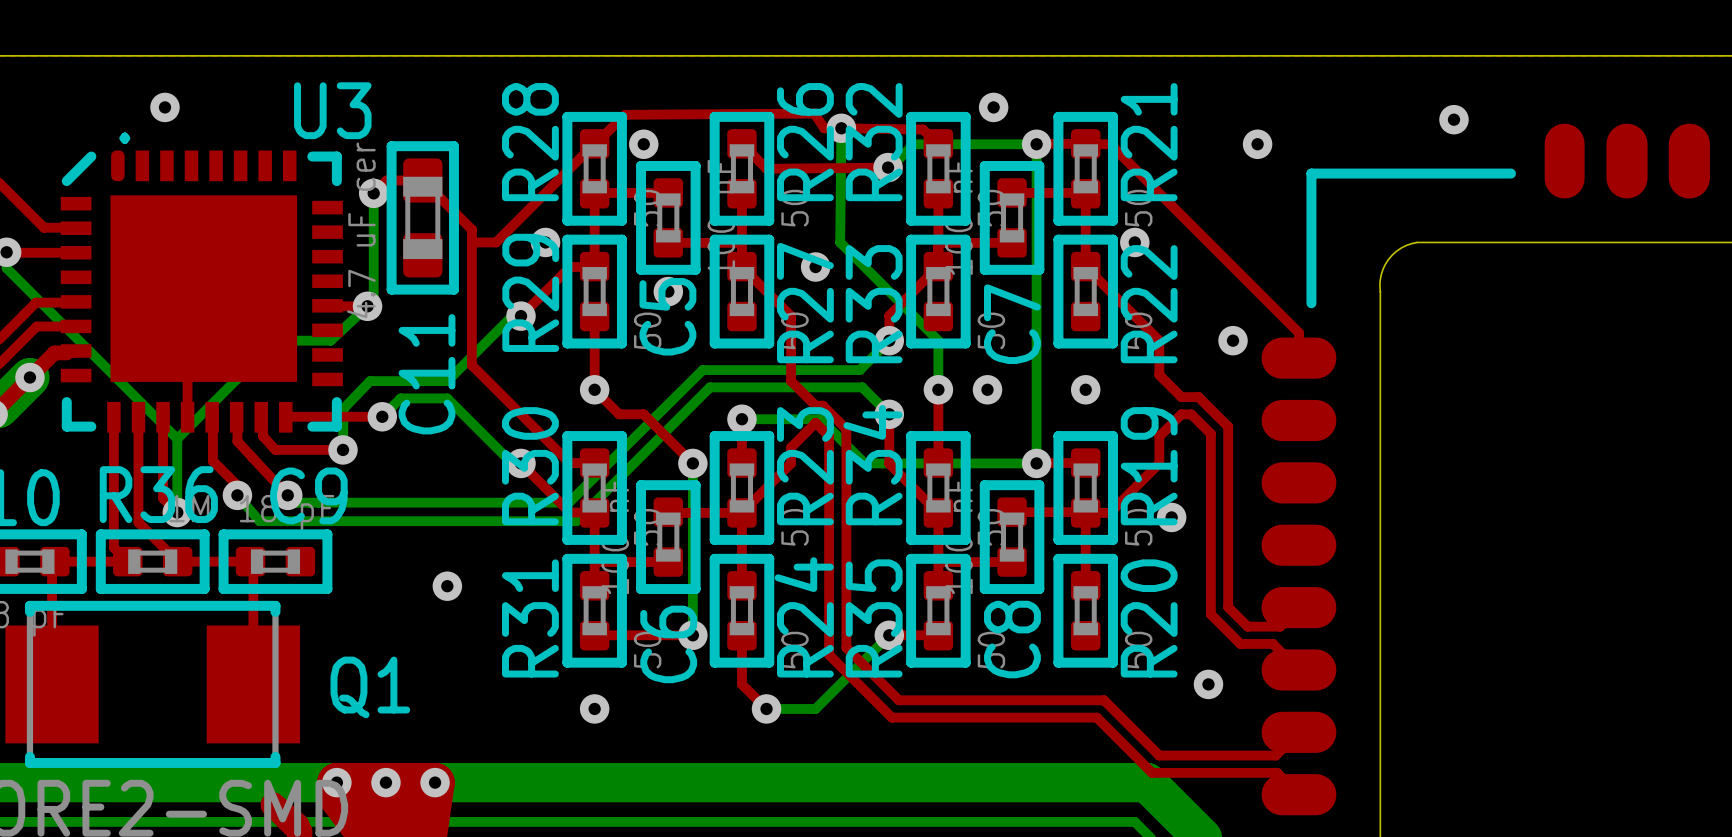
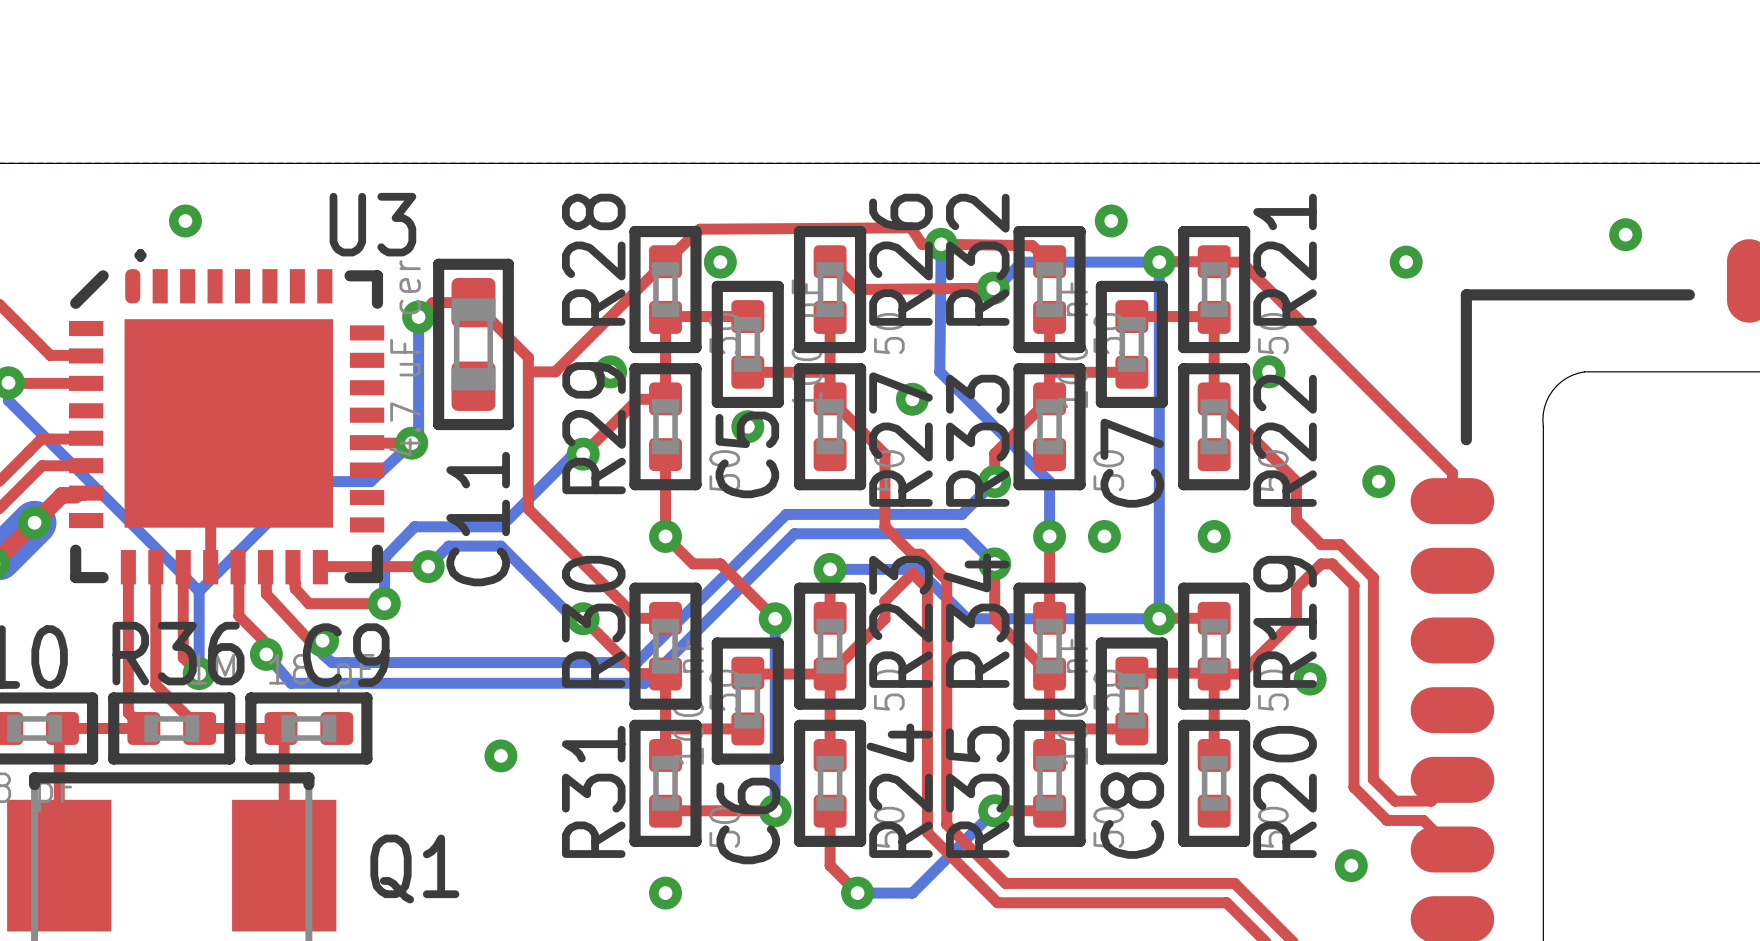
top track: (237, 441) (287, 495) -> (266, 594) (309, 640) (322, 640)
via position: (287, 495) -> (322, 640)

